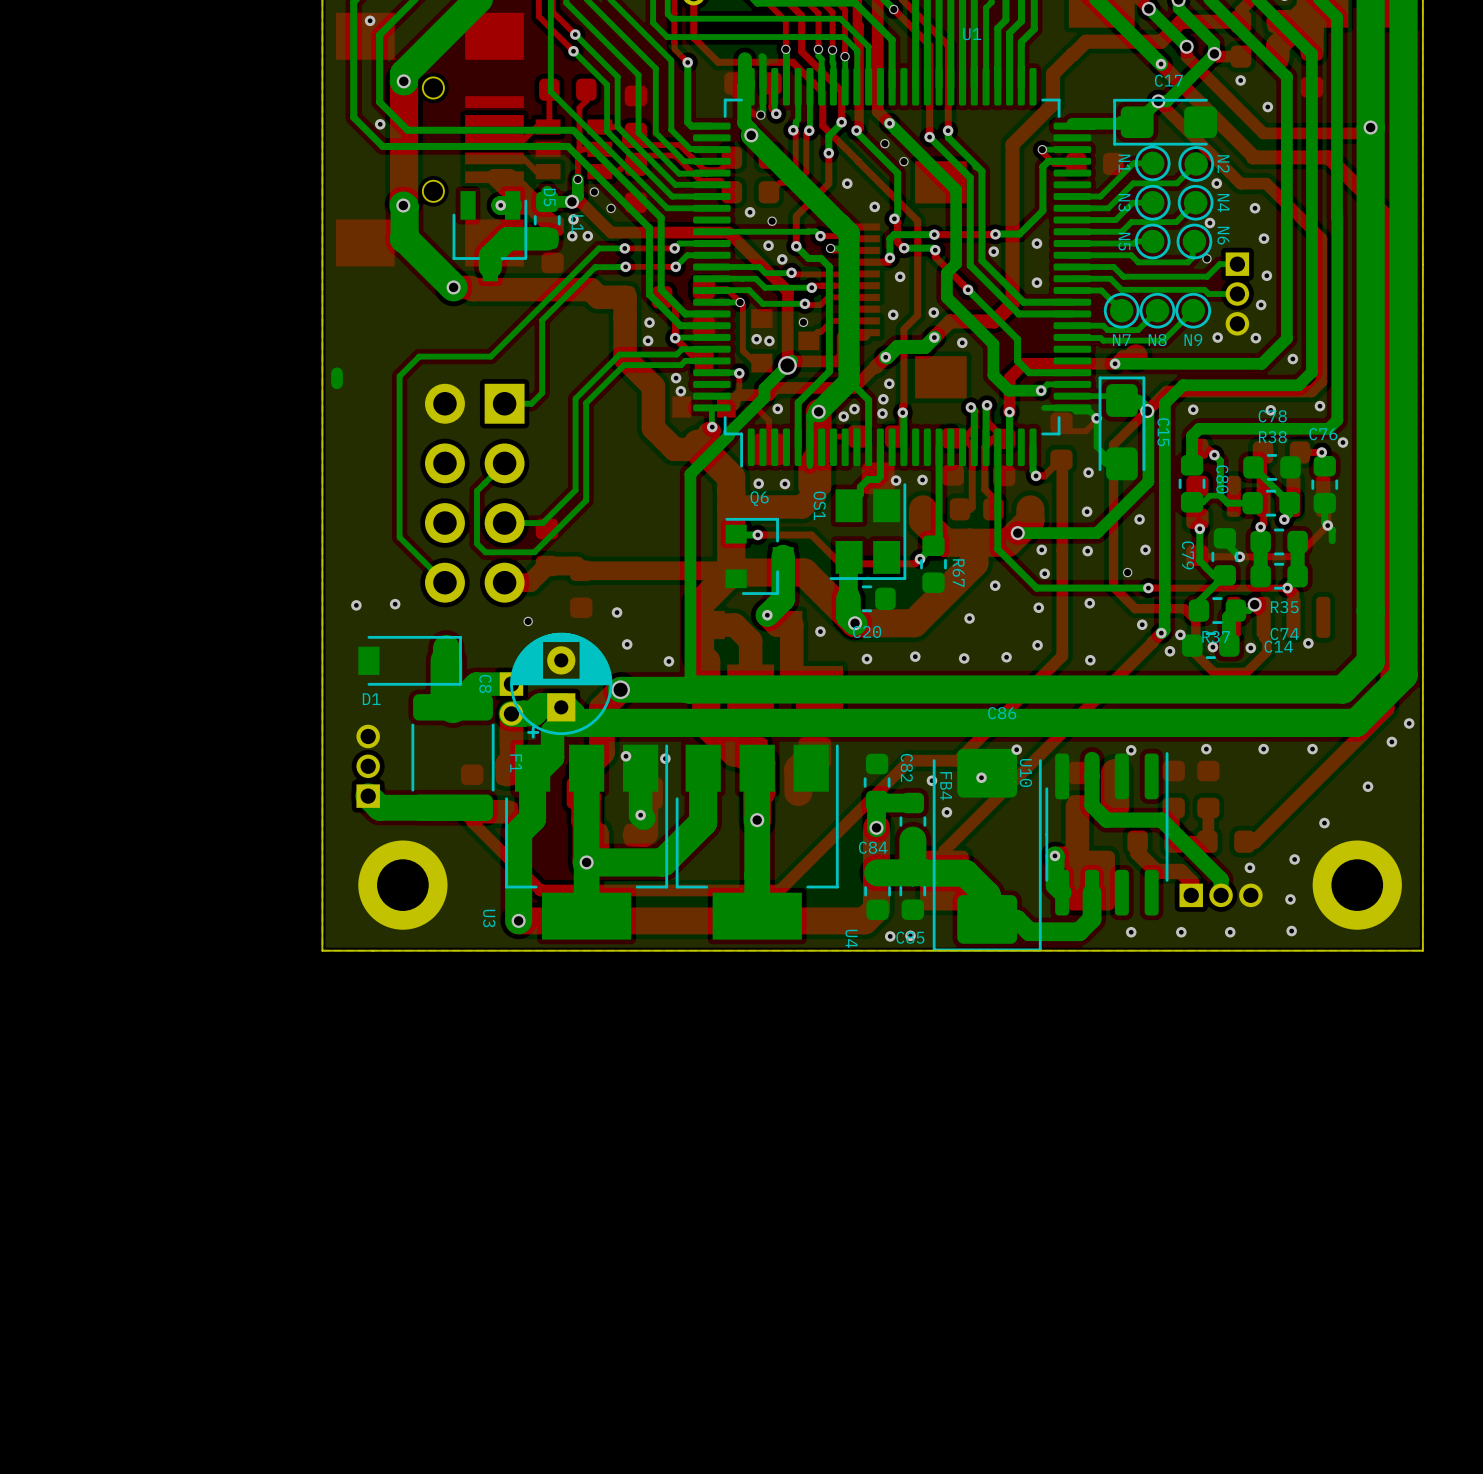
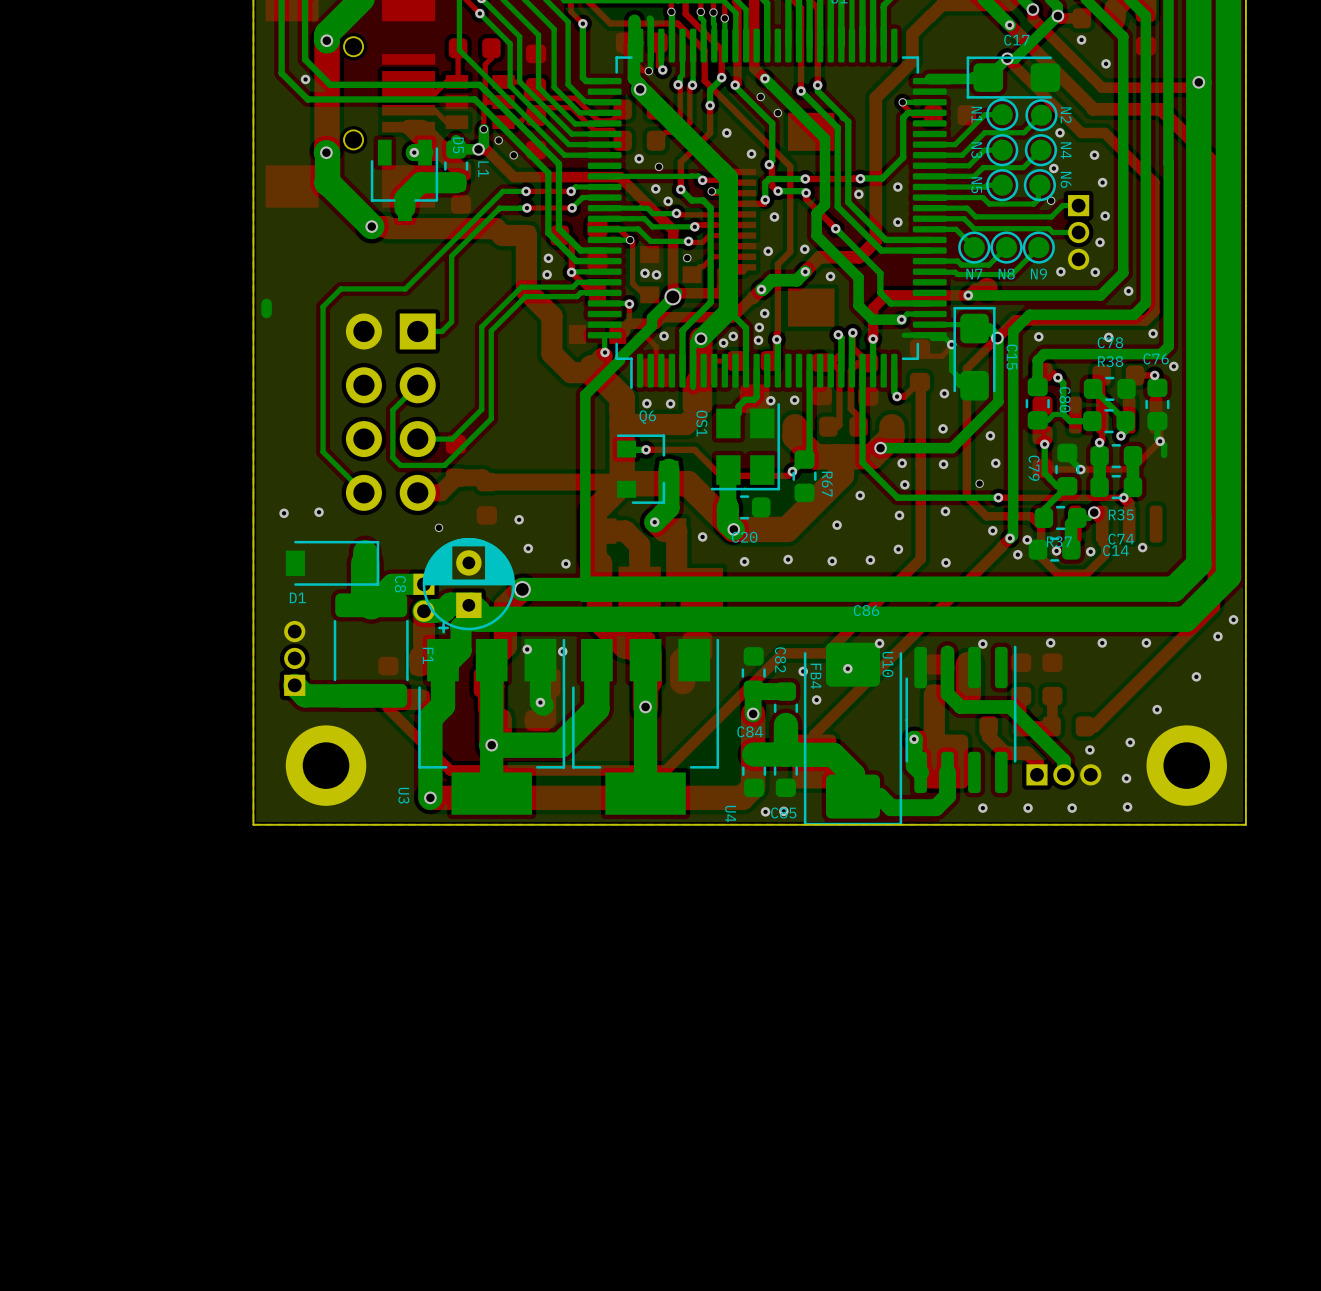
via: (573, 219) -> none
via: (572, 236) -> none
via: (587, 236) -> none
via: (676, 378) -> none
via: (680, 391) -> none

